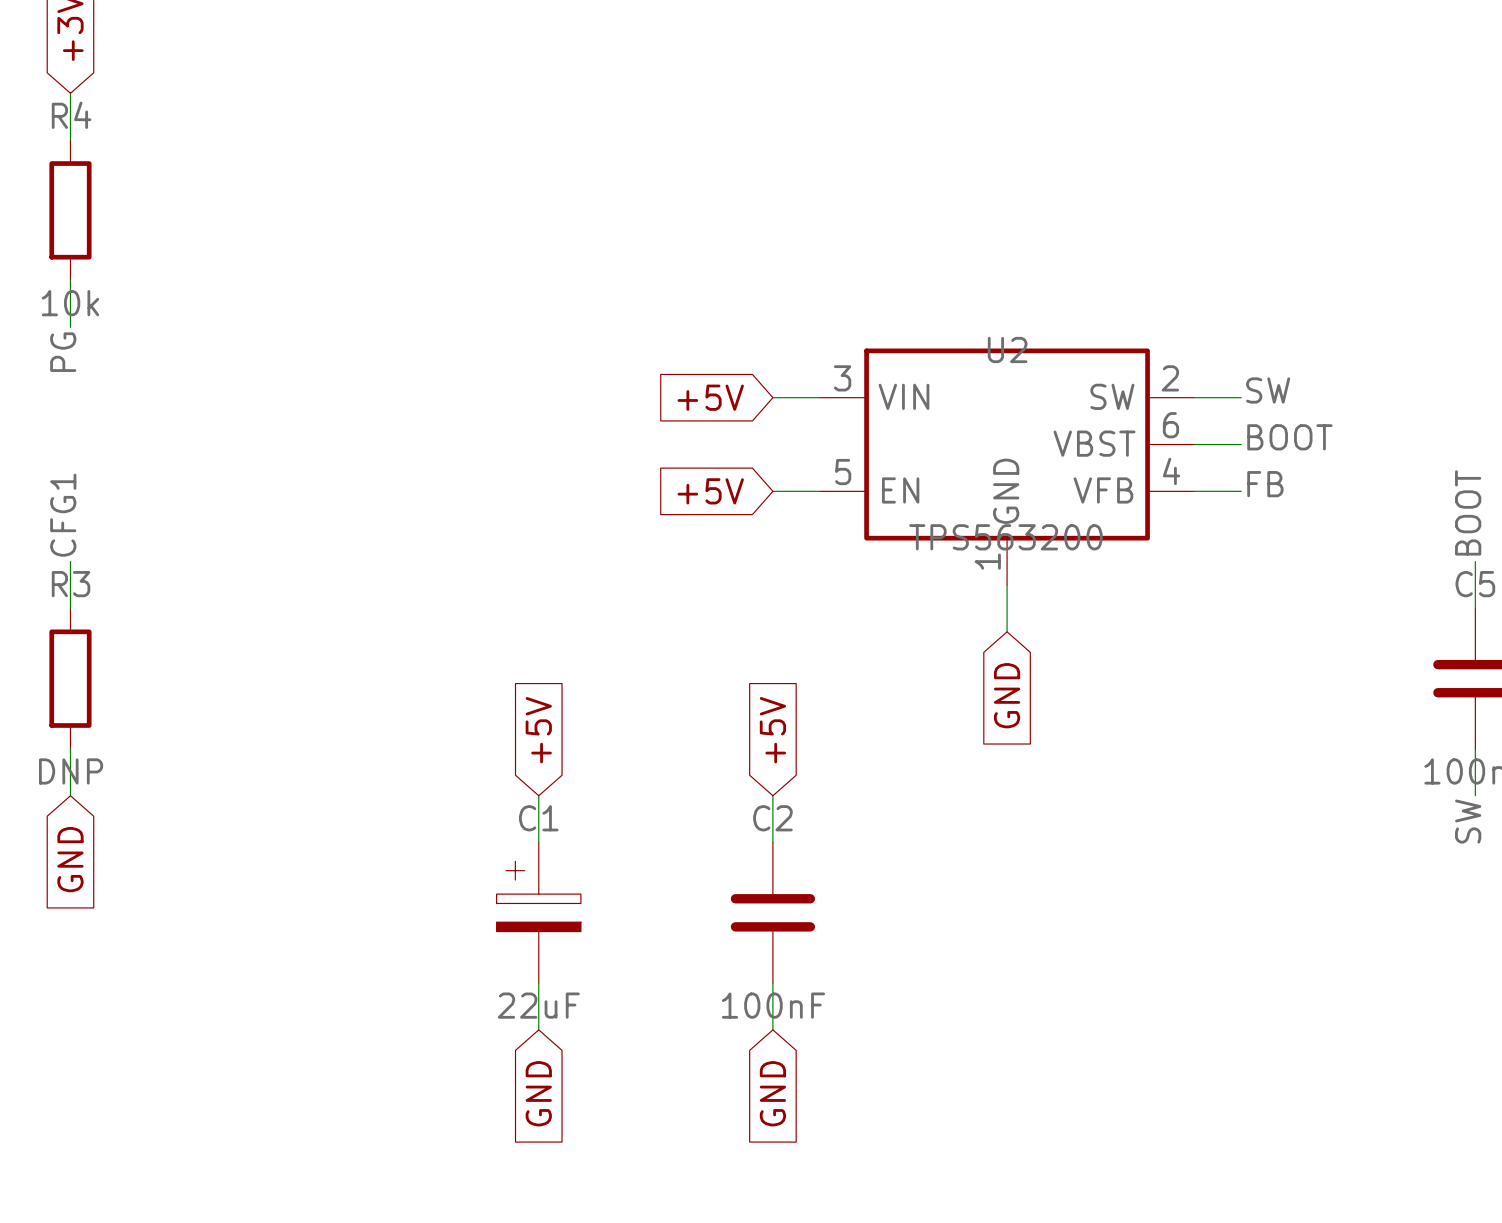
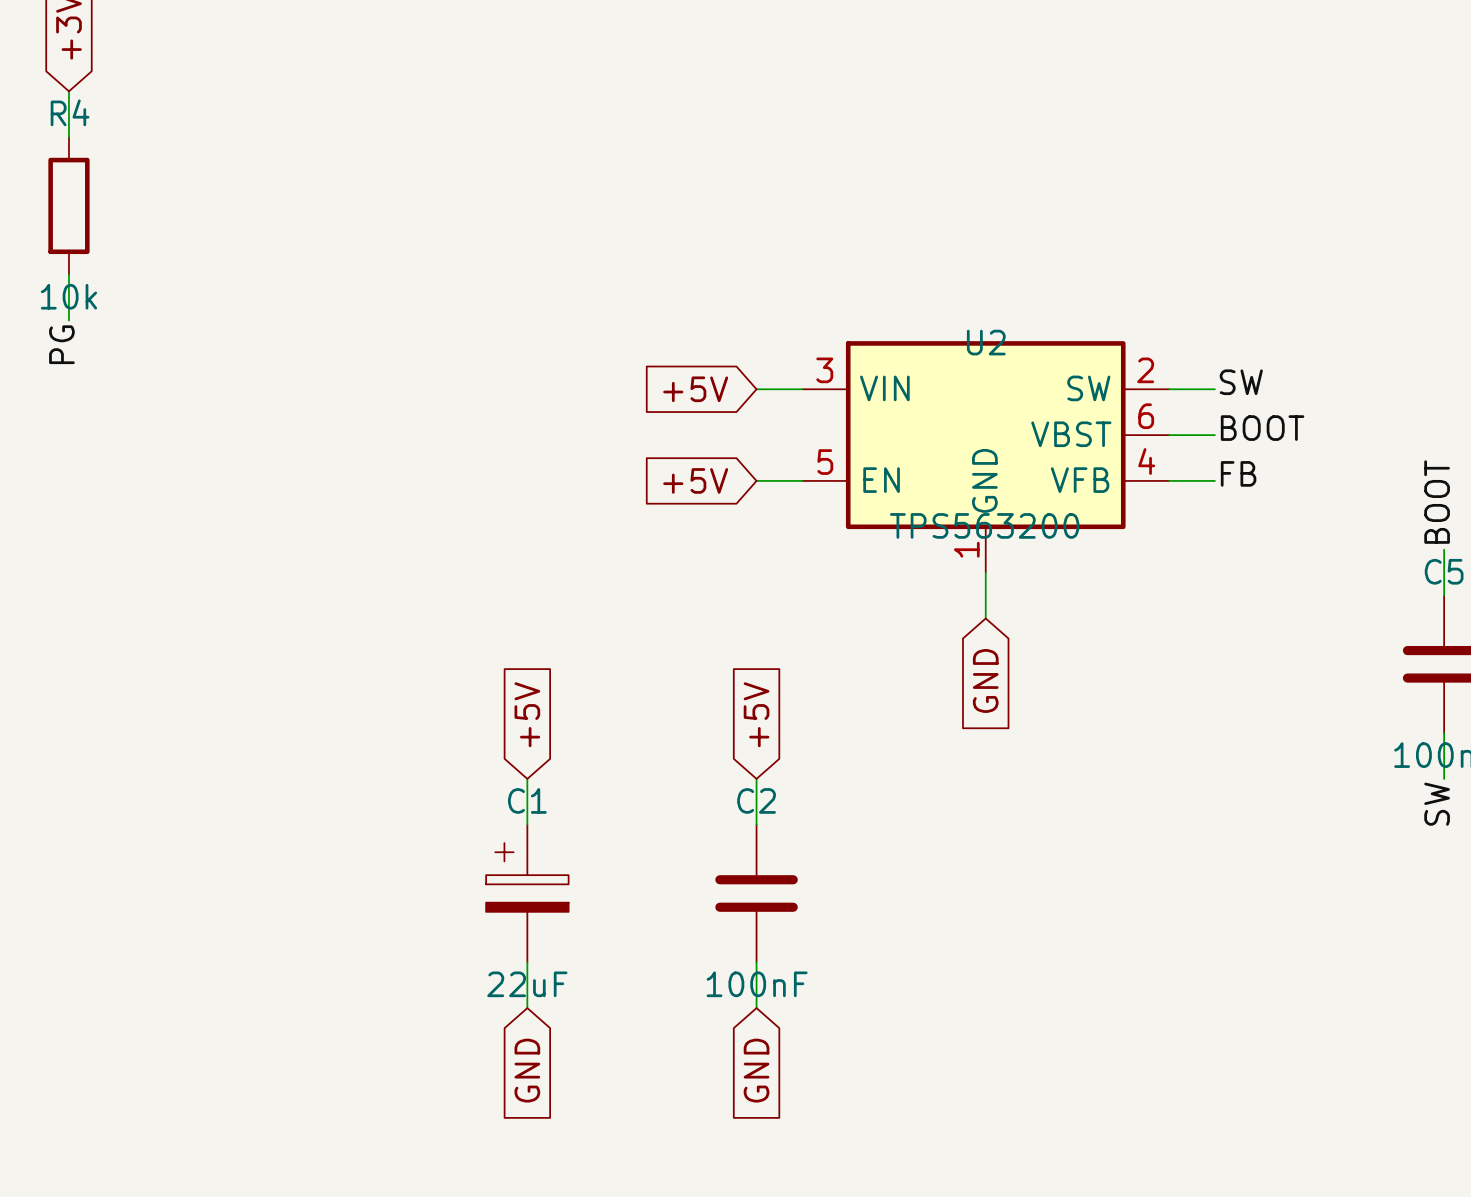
label: CFG1 (63, 515) -> none
wire: (70, 561) (70, 608) -> none
R3: DNP (70, 678) -> none
wire: (70, 748) (70, 795) -> none
global label: GND (70, 859) -> none

